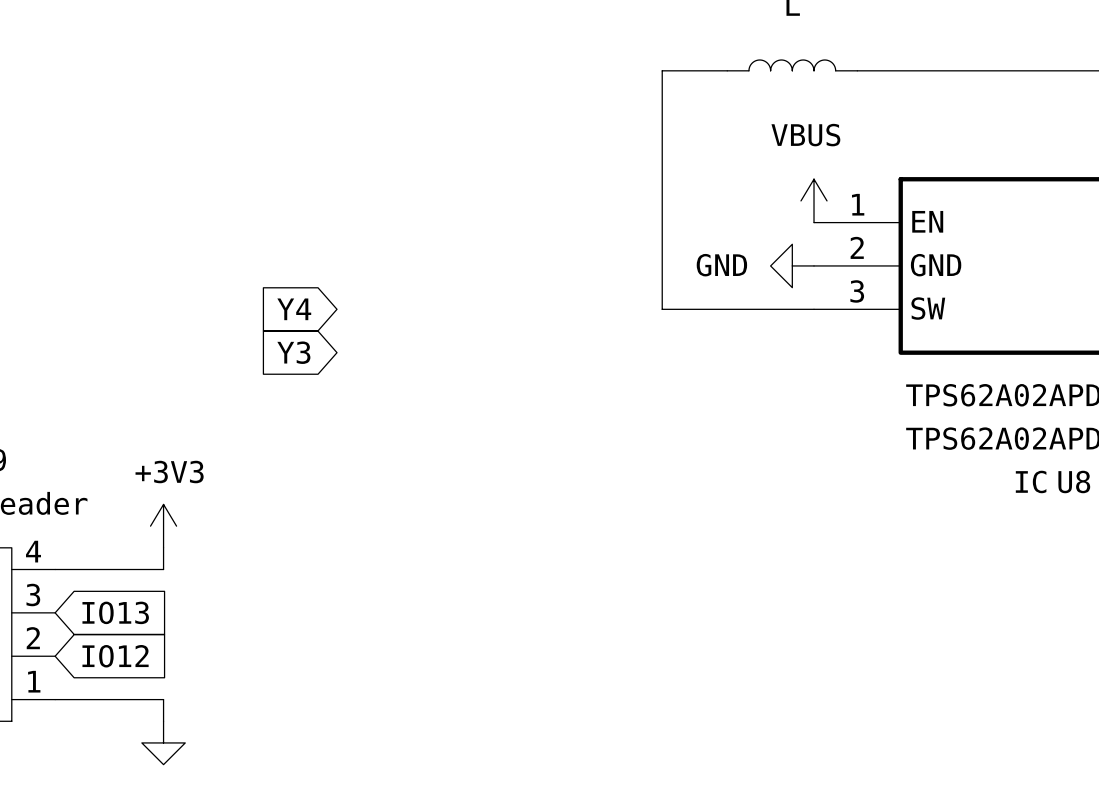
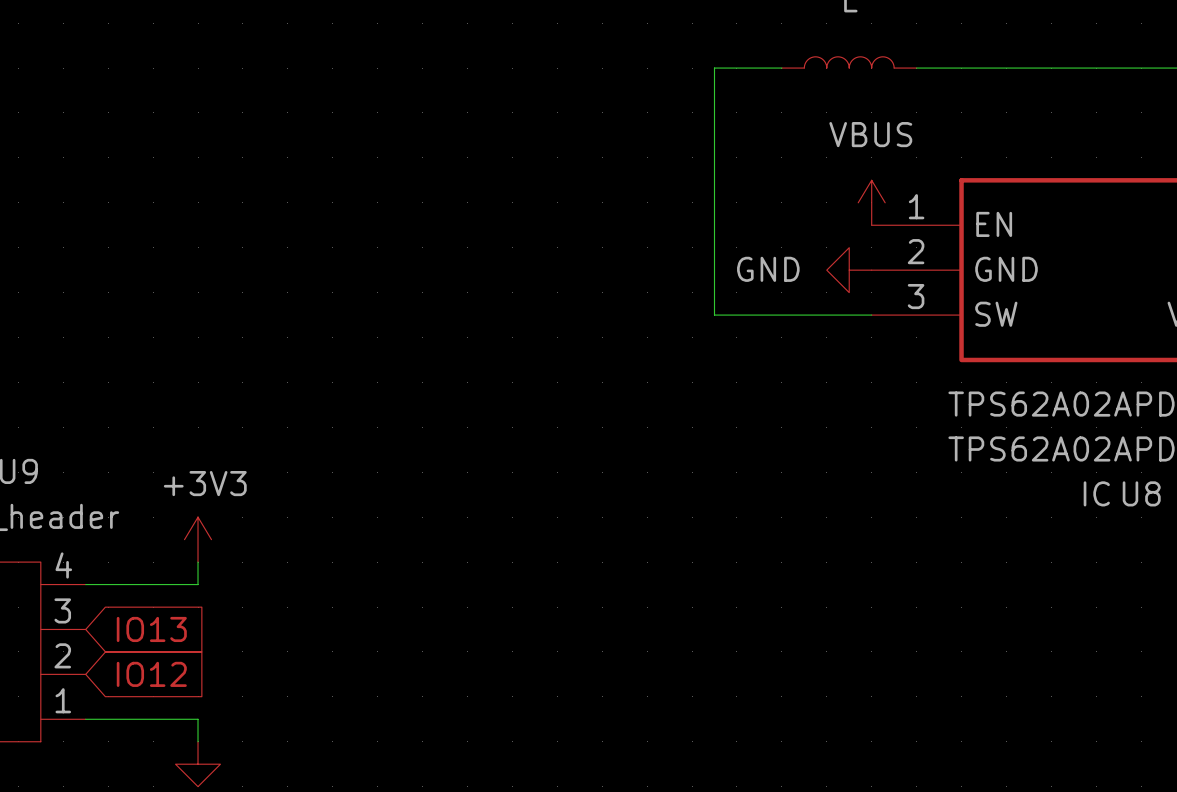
global label: Y4 (294, 309) -> none
global label: Y3 (293, 352) -> none

